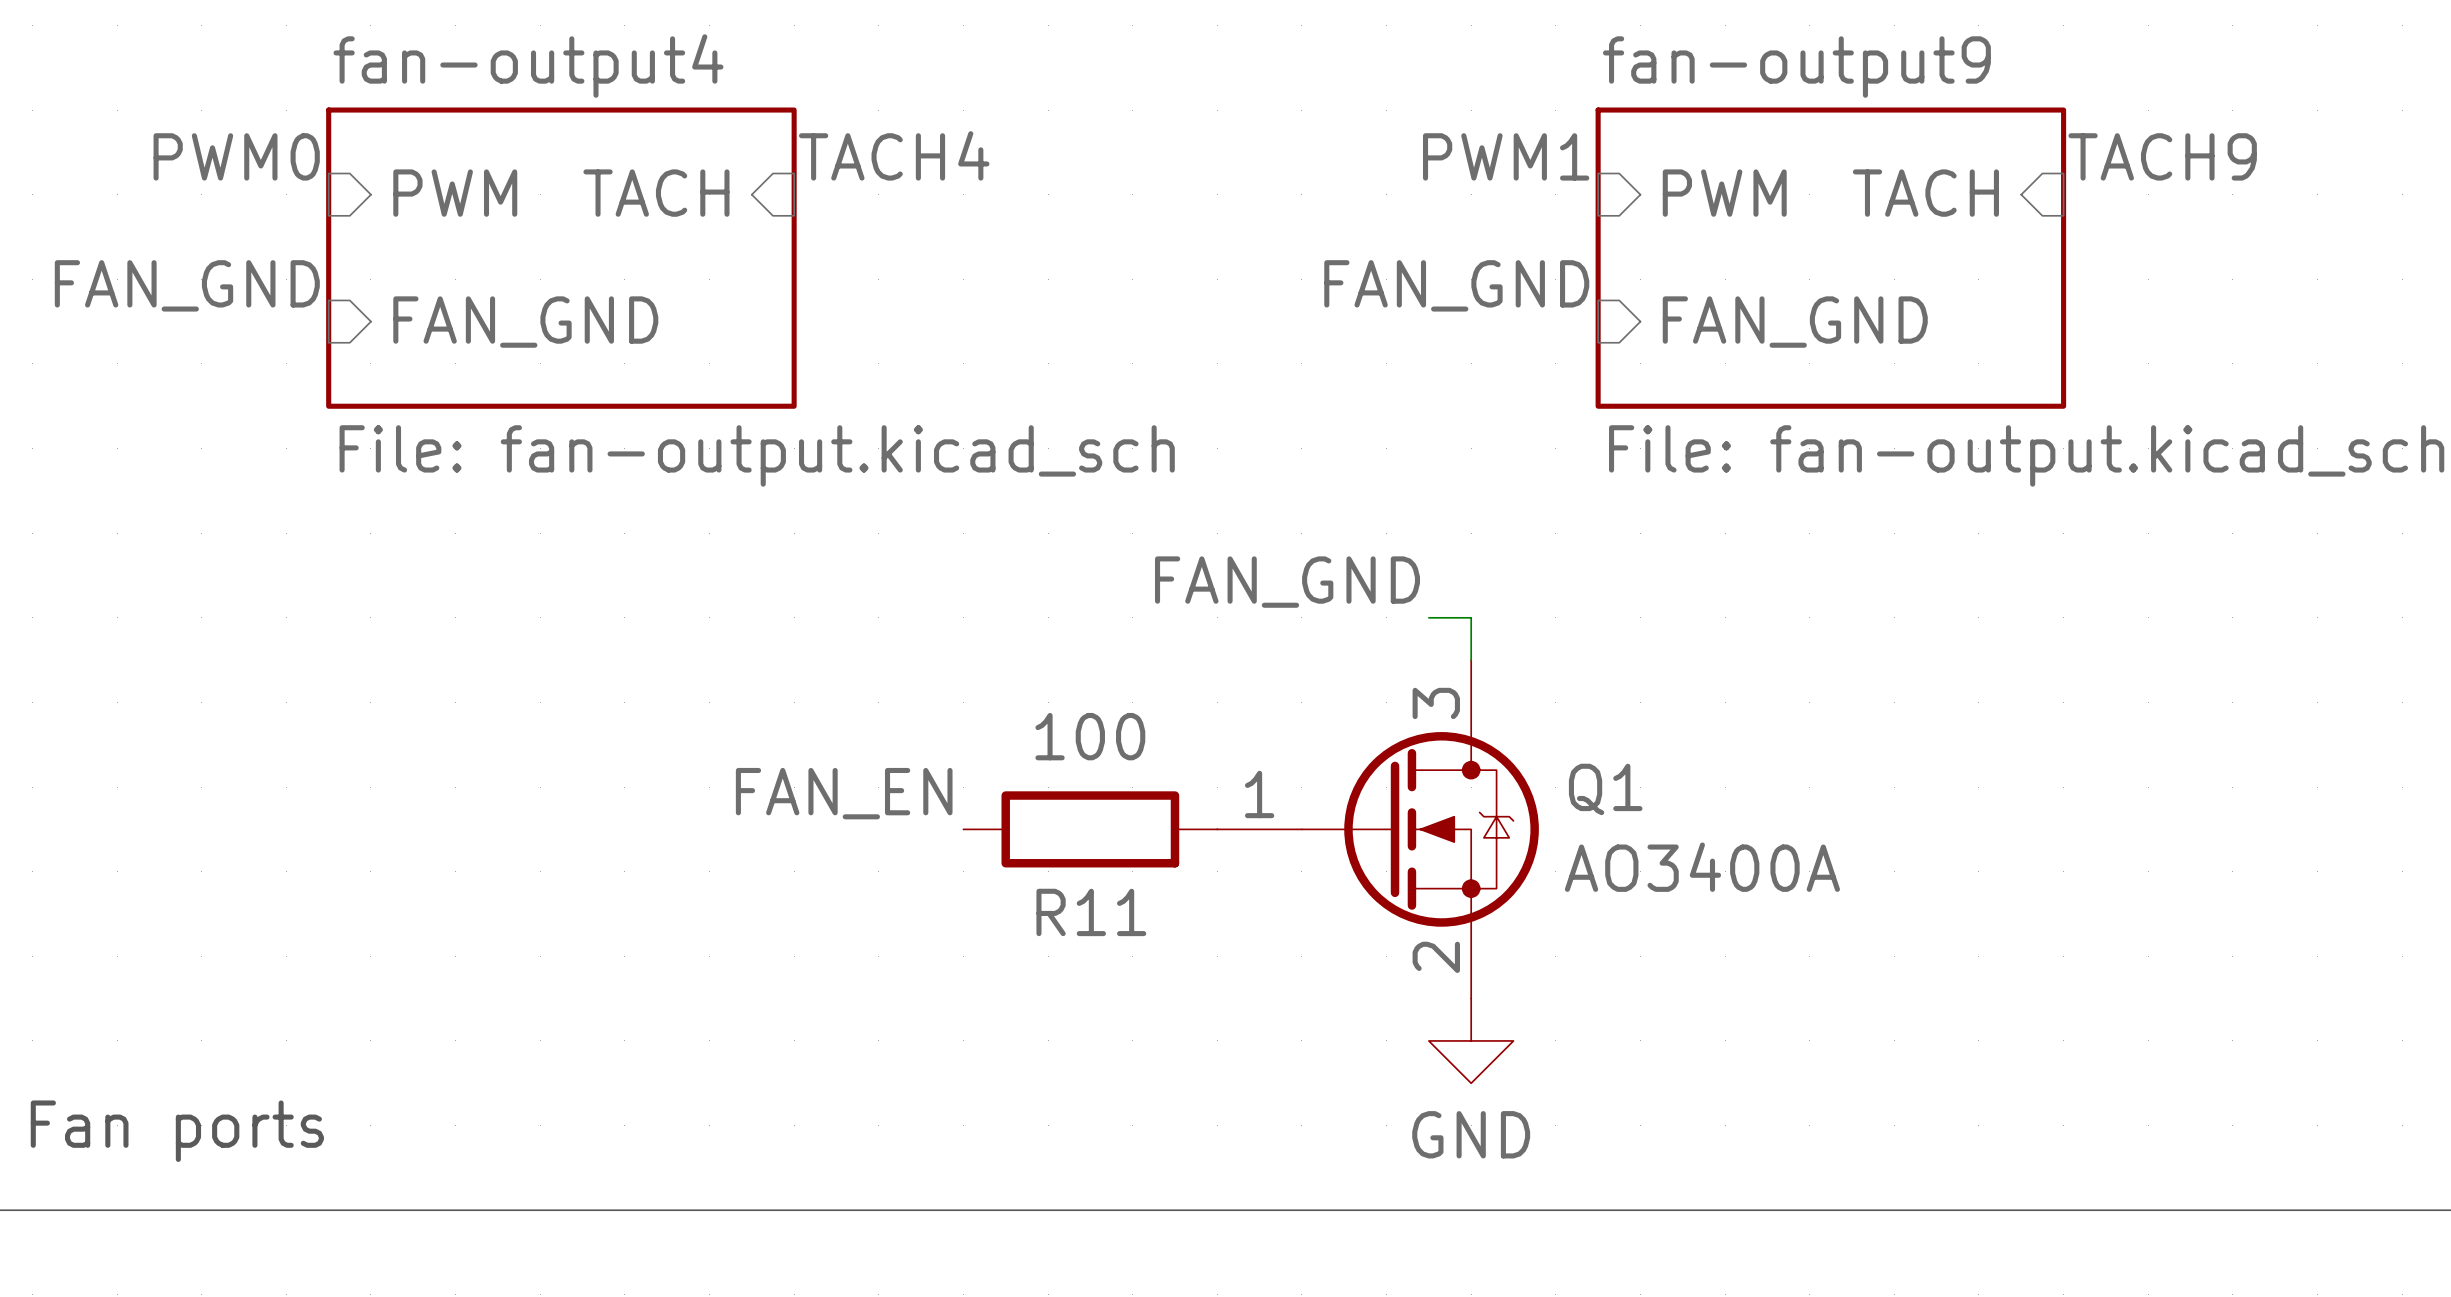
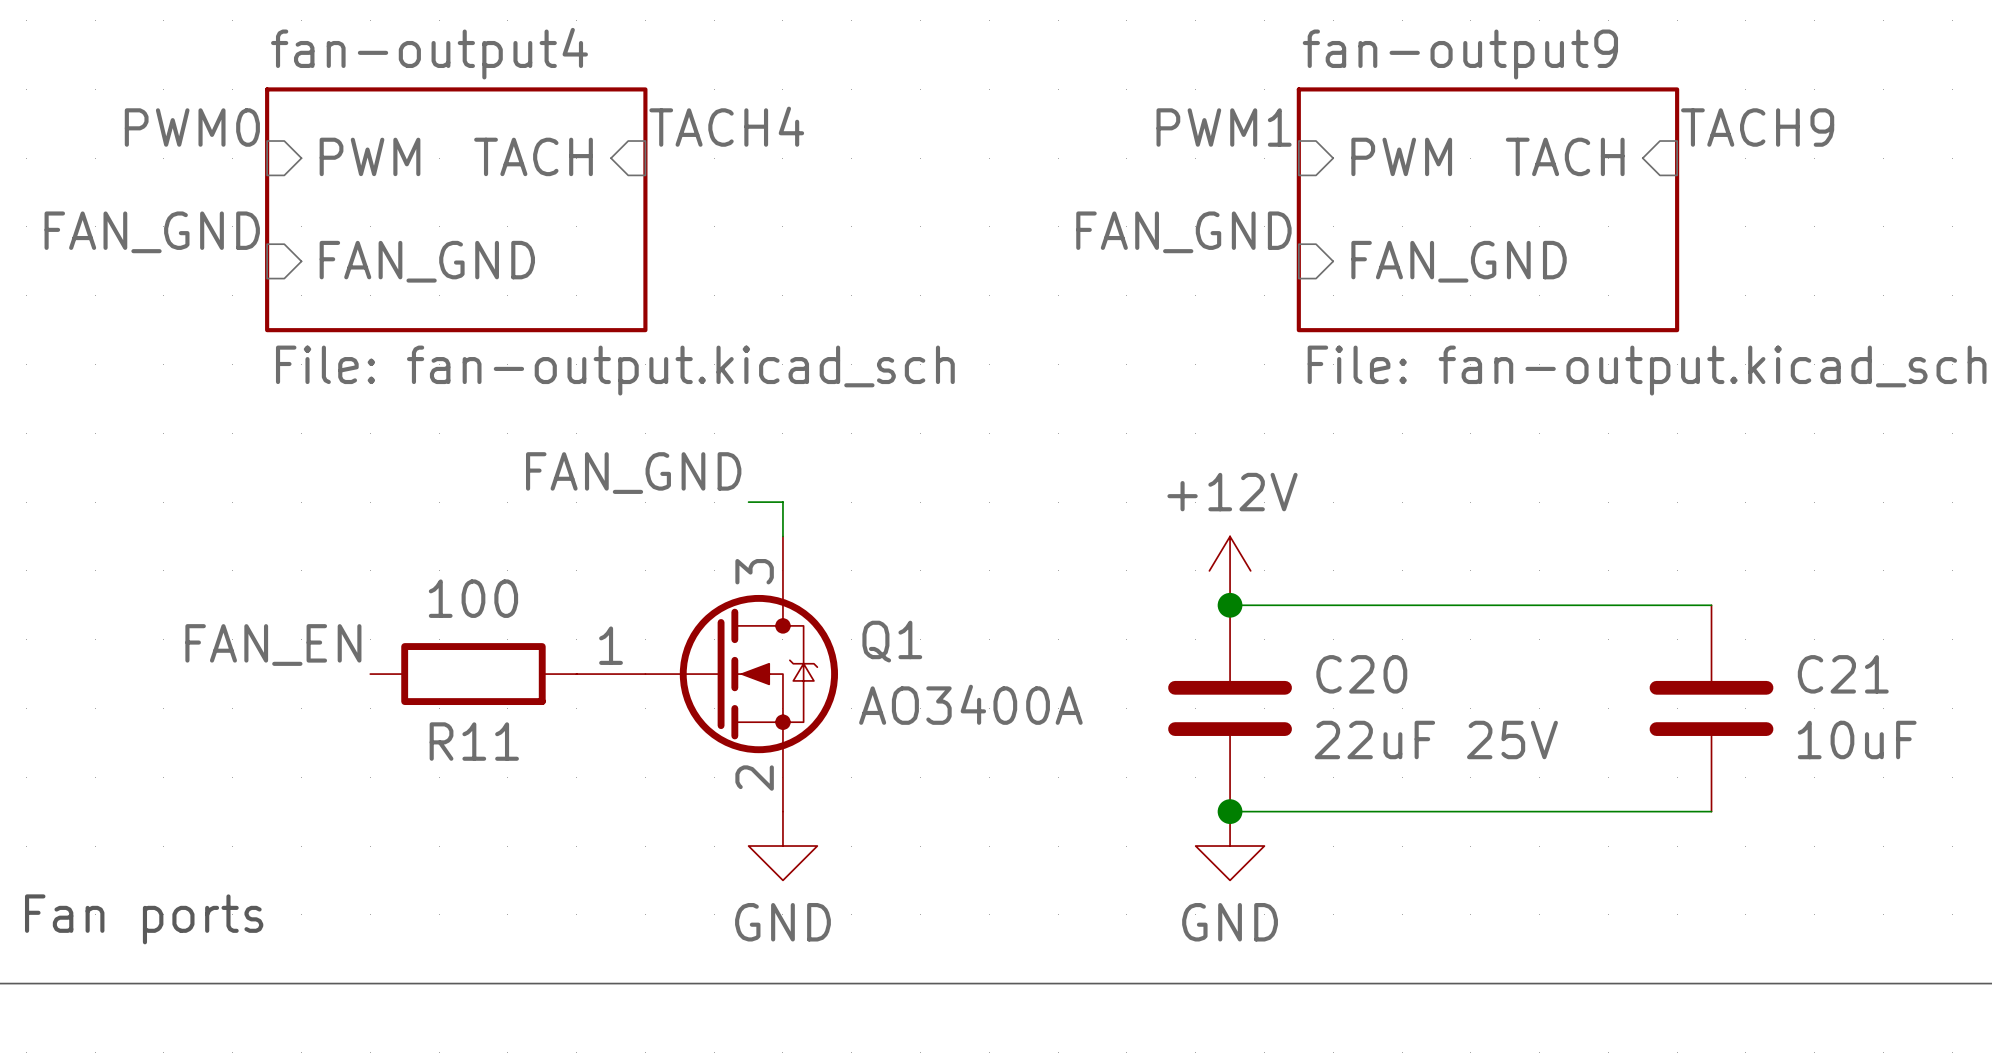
label position: FAN_GND (1287, 582) -> FAN_GND (633, 473)
wire: (1428, 617) (1471, 617) (1471, 660) -> (748, 502) (782, 502) (782, 536)
power symbol: none -> +12V (1230, 570)
wire: none -> (1230, 605) (1711, 605)
junction: none -> (1230, 605)
label position: FAN_EN (844, 793) -> FAN_EN (273, 645)
R11 position: (1090, 829) -> (473, 674)
Q1 position: (1378, 829) -> (707, 674)
C20: none -> 22uF 25V (1230, 708)
C21: none -> 10uF (1711, 708)
wire: none -> (1230, 811) (1711, 811)
junction: none -> (1230, 811)
power symbol: none -> GND (782, 846)
power symbol position: GND (1471, 1040) -> GND (1230, 846)

